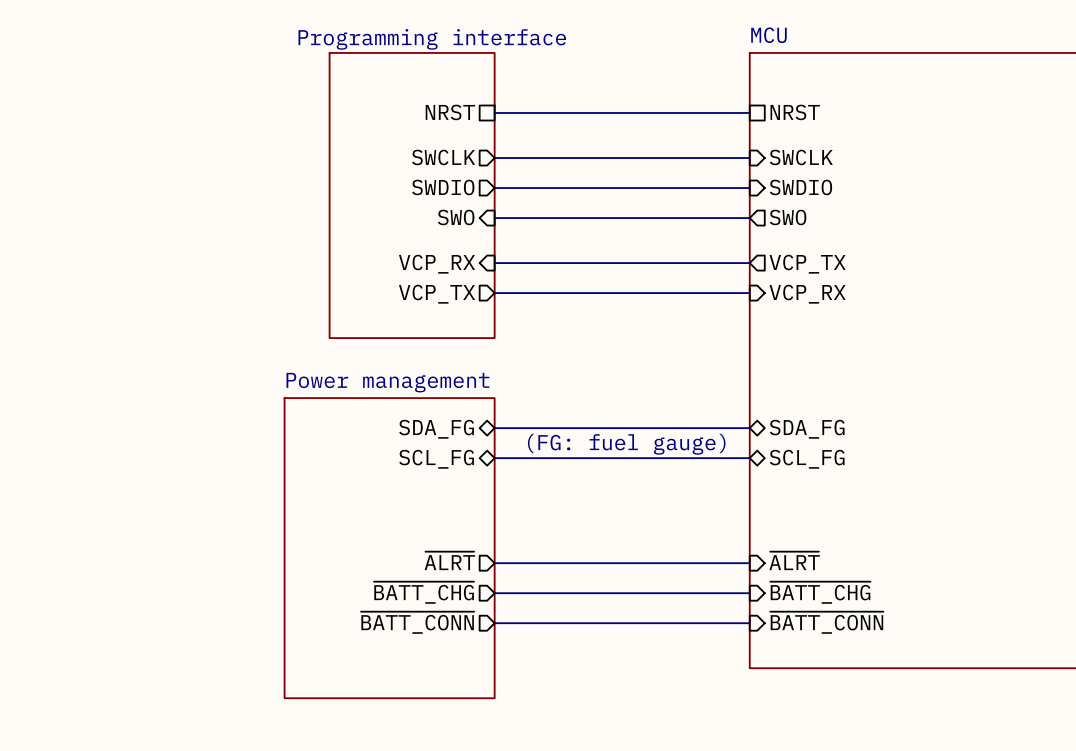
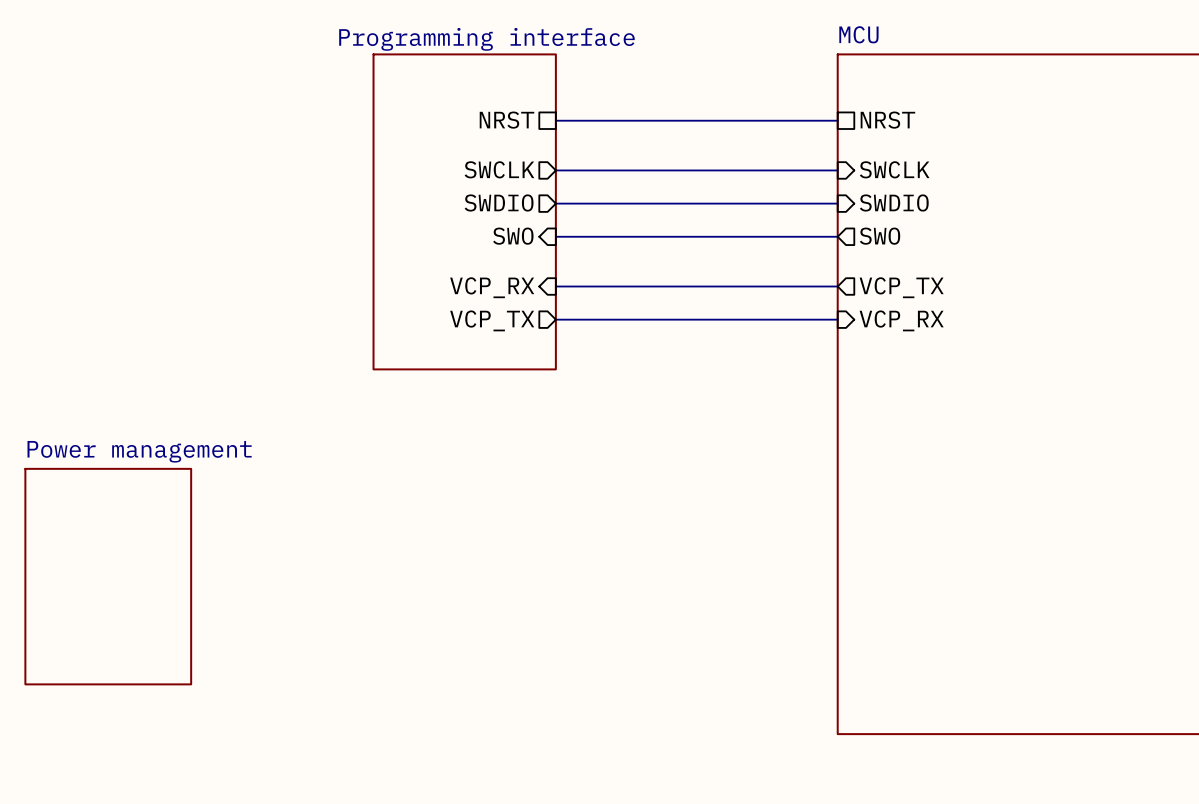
wire: (494, 428) (749, 428) -> none
sheet pin: SDA_FG (436, 429) -> none
sheet pin: SDA_FG (807, 429) -> none
text: (FG: fuel gauge) (626, 444) -> none
wire: (494, 458) (749, 458) -> none
sheet pin: SCL_FG (436, 459) -> none
sheet pin: SCL_FG (807, 459) -> none
sheet Power management: none -> (108, 576)
sheet Power management: (389, 548) -> none
sheet pin: ~{ALRT} (449, 560) -> none
sheet pin: ~{ALRT} (794, 560) -> none
wire: (494, 563) (749, 563) -> none
sheet pin: ~{BATT_CHG} (423, 592) -> none
sheet pin: ~{BATT_CHG} (820, 592) -> none
wire: (494, 593) (749, 593) -> none
sheet pin: ~{BATT_CONN} (417, 622) -> none
sheet pin: ~{BATT_CONN} (826, 622) -> none
wire: (494, 623) (749, 623) -> none

